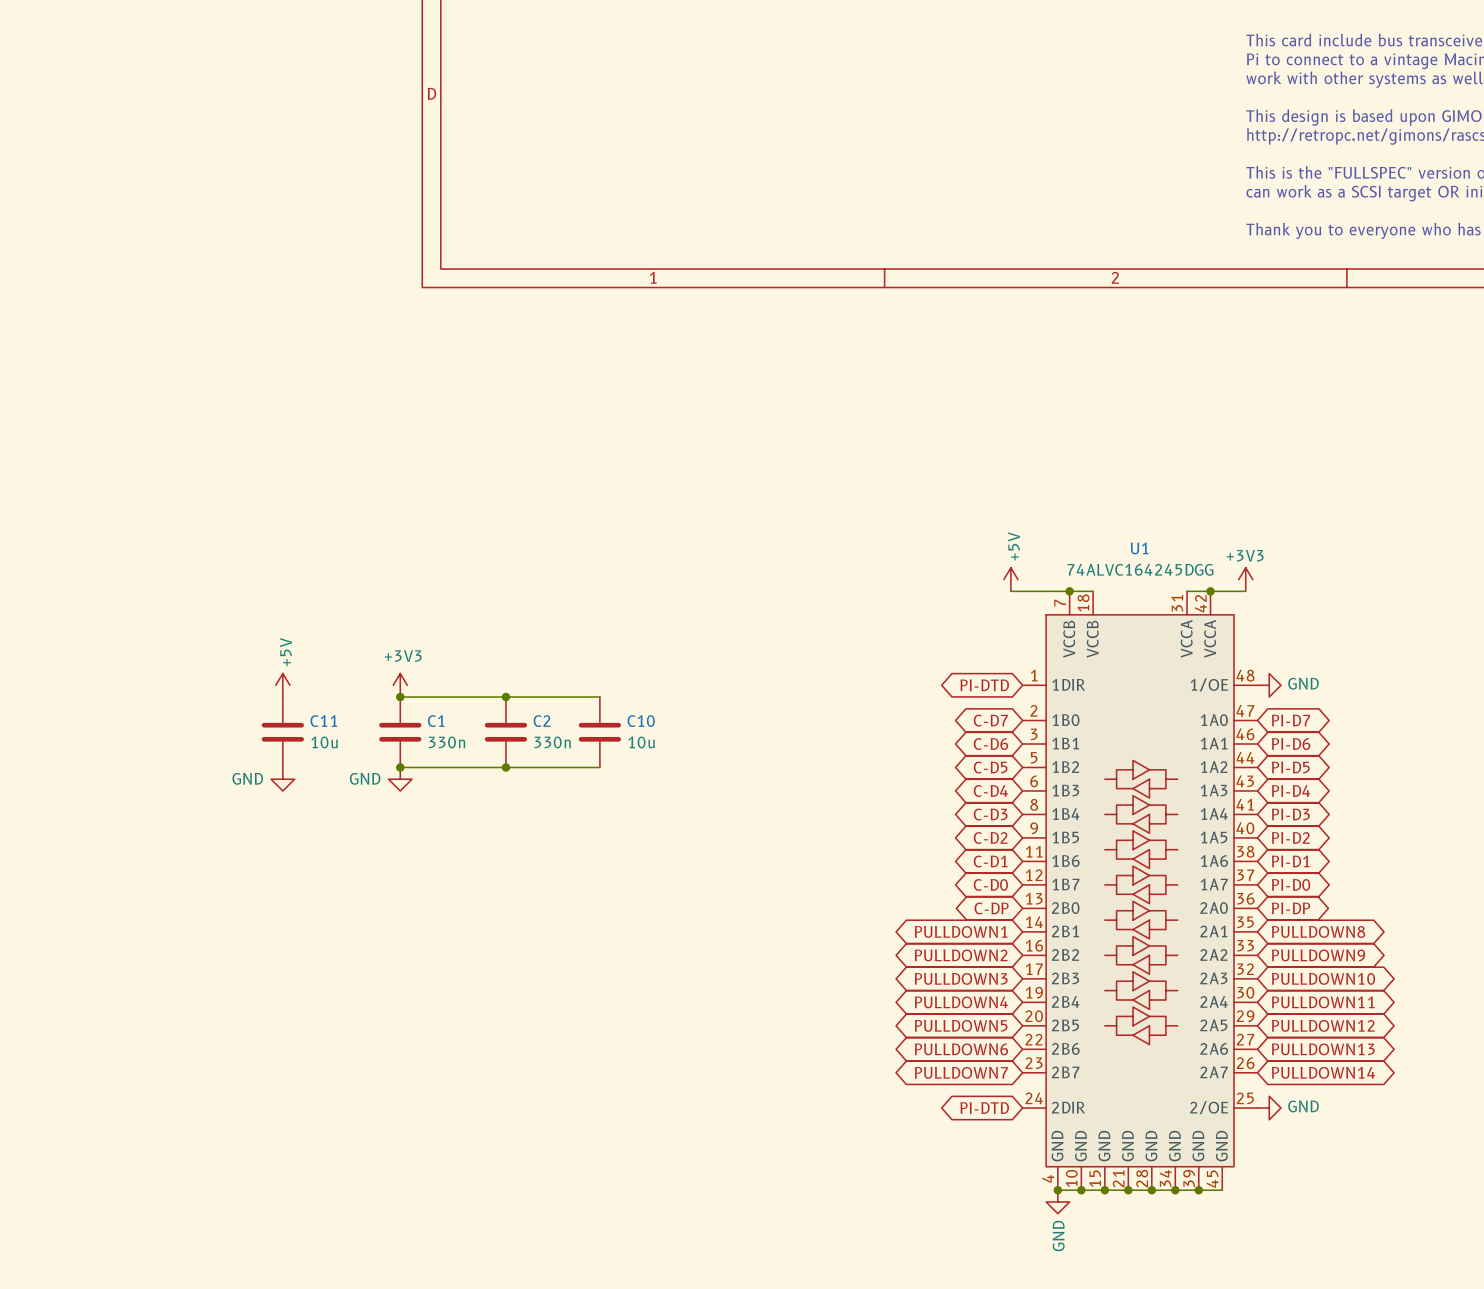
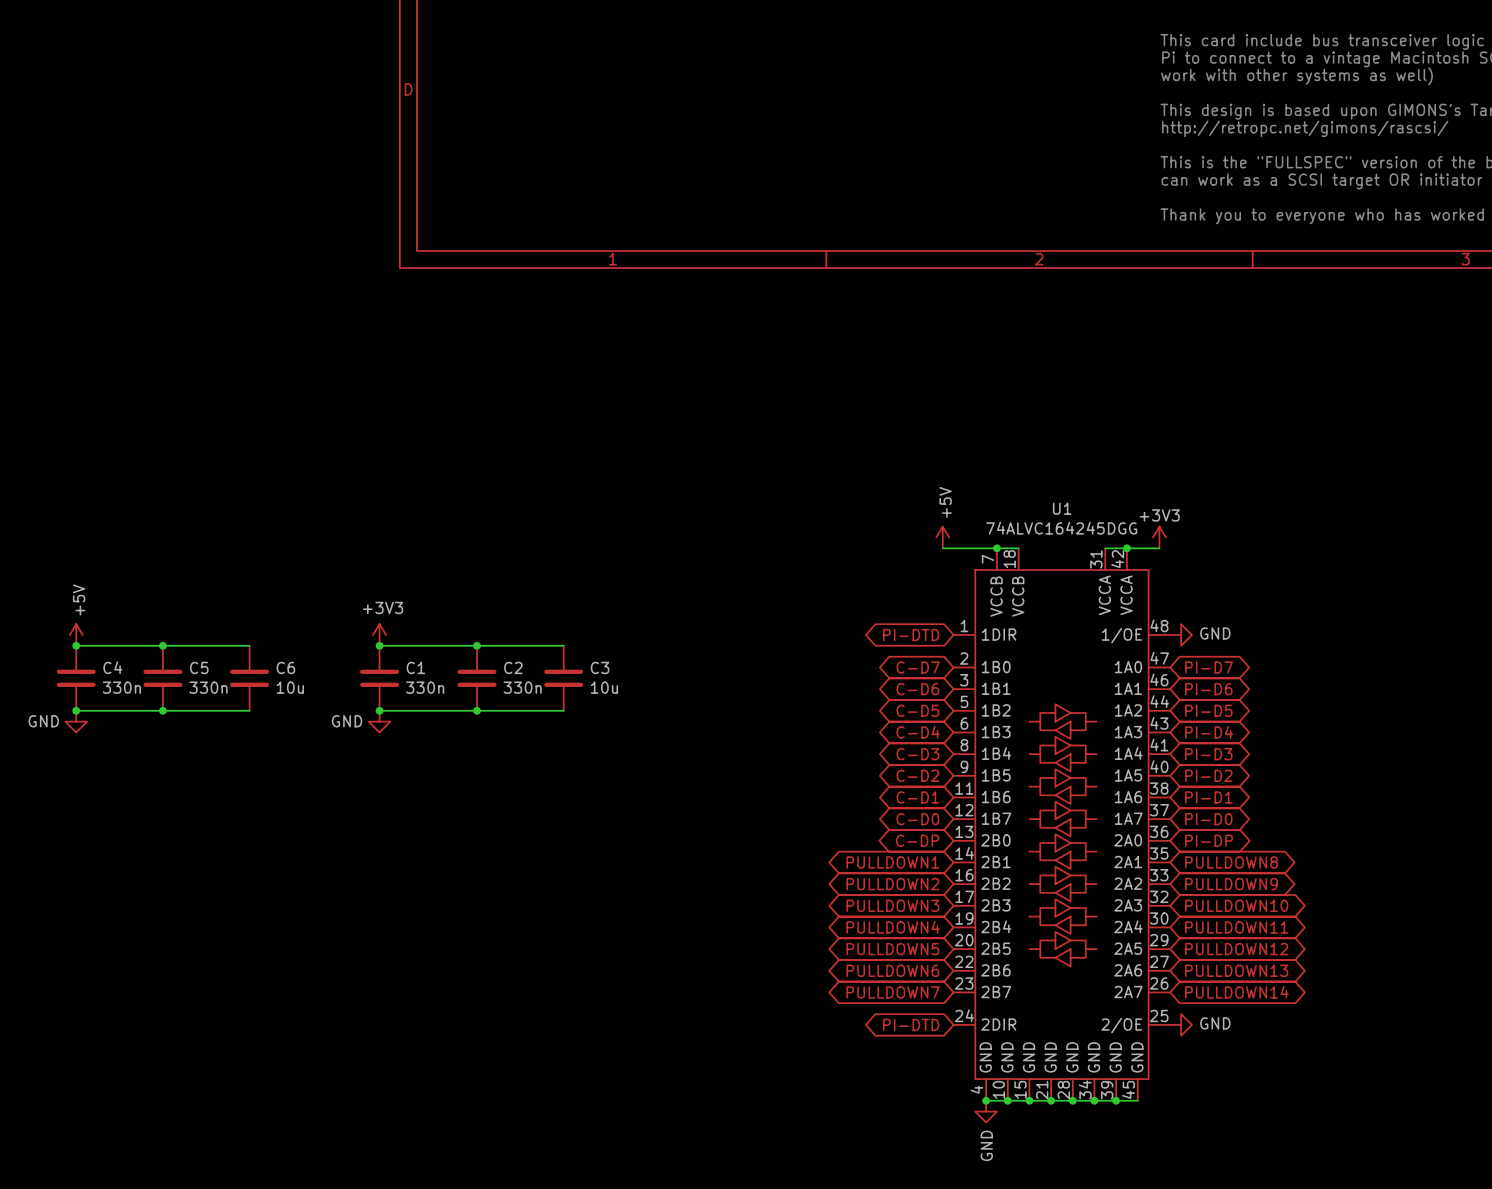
power symbol position: +5V (282, 685) -> +5V (76, 634)
wire: none -> (76, 645) (249, 645)
junction: none -> (76, 645)
junction: none -> (162, 645)
C10 name: C10 (641, 721) -> C3 (600, 667)
C4: none -> 330n (76, 678)
C5: none -> 330n (162, 678)
C6: none -> 10u (249, 678)
C11: 10u (282, 732) -> none
wire: none -> (76, 710) (249, 710)
junction: none -> (76, 710)
junction: none -> (162, 710)
power symbol position: GND (282, 779) -> GND (76, 721)

